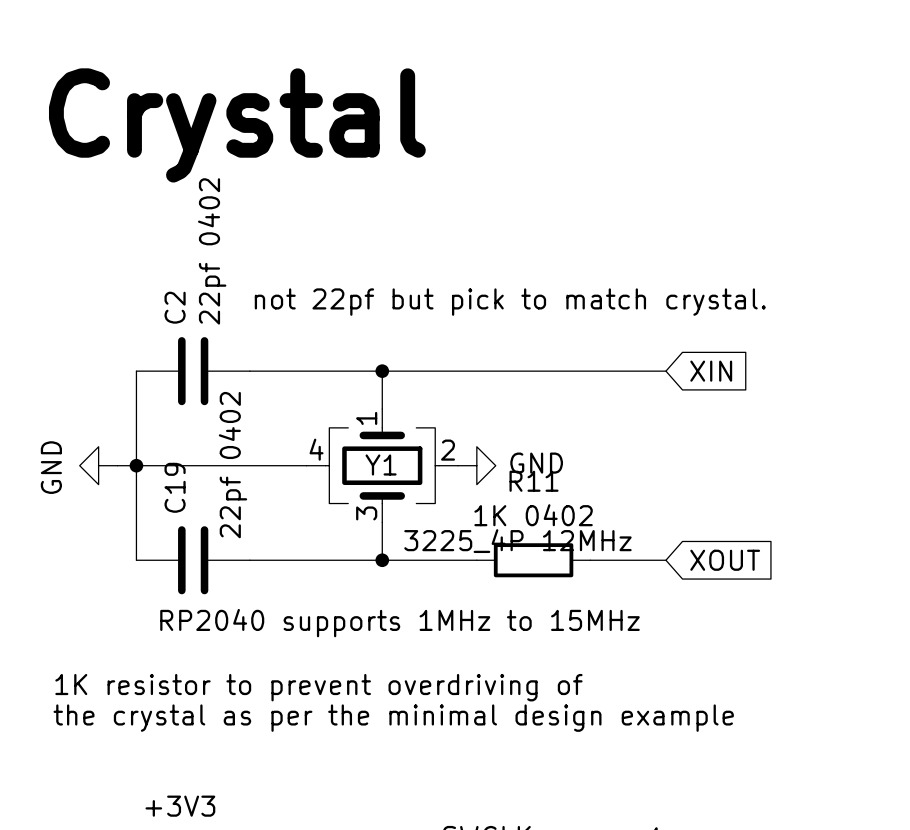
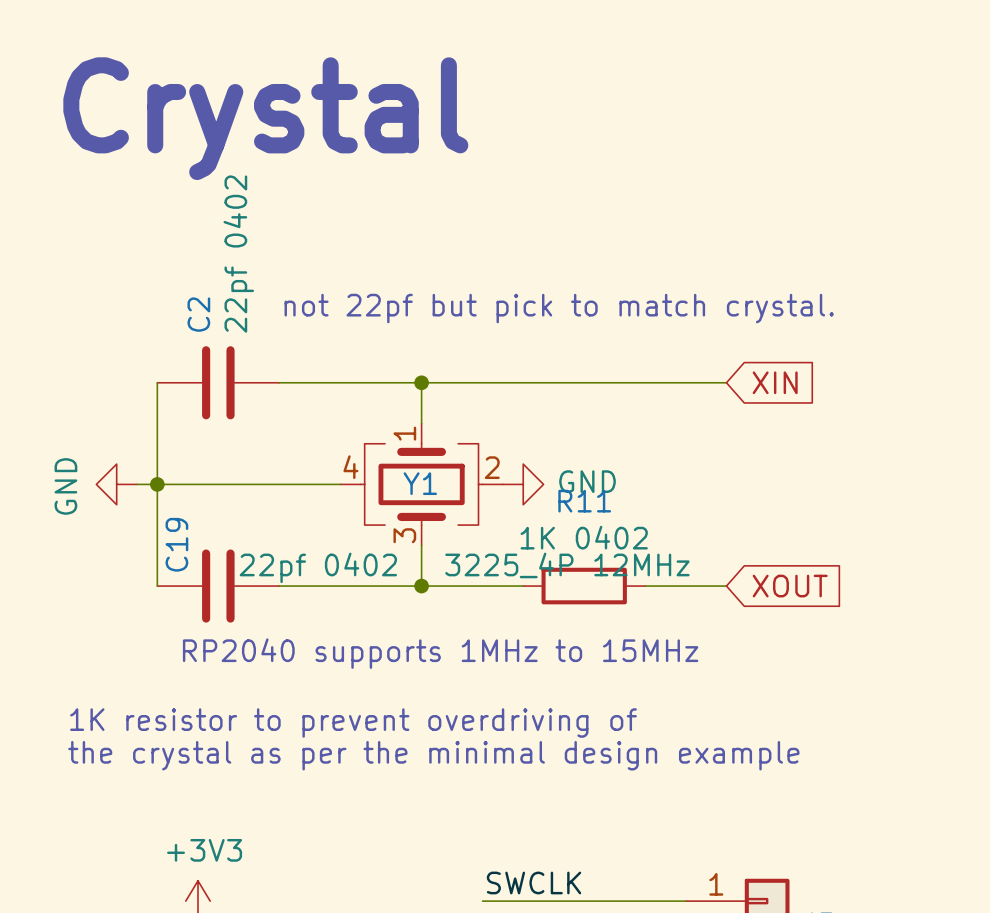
C19 value rotation: 0° (232, 465) -> 90° clockwise (318, 567)
C19 name position: C19 (175, 487) -> C19 (176, 544)

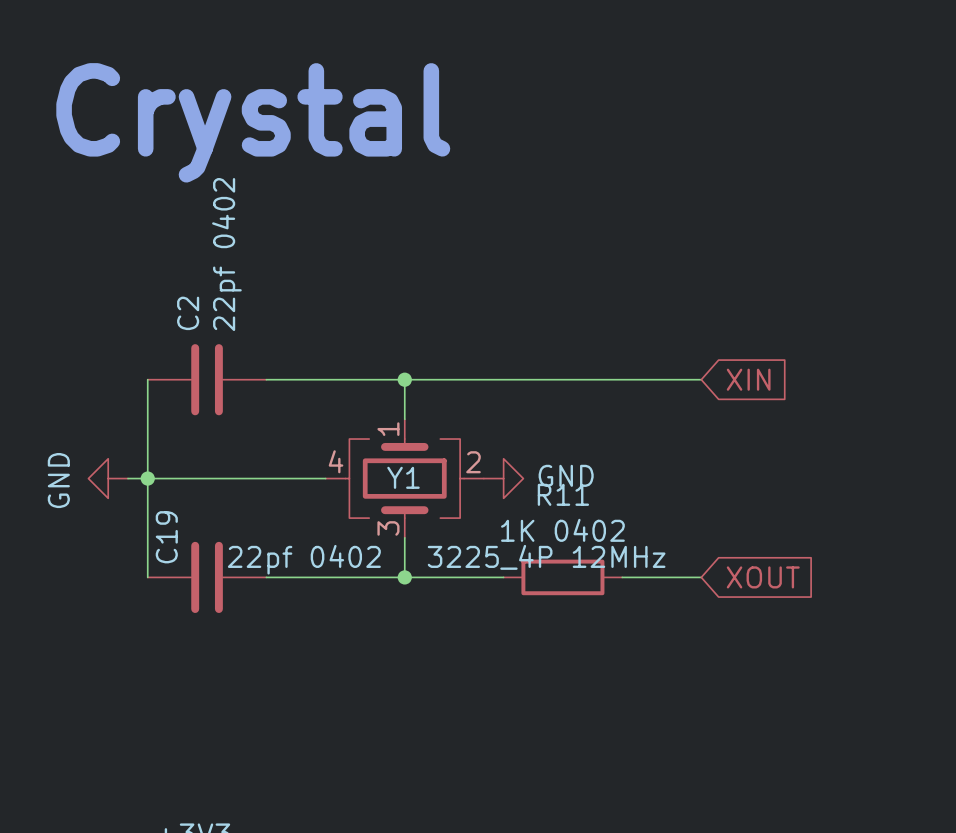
text: not 22pf but pick to match crystal. (559, 308) -> none
text: RP2040 supports 1MHz to 15MHz (440, 653) -> none
text: 1K resistor to prevent overdriving of (353, 723) -> none
text: the crystal as per the minimal design example (433, 755) -> none

